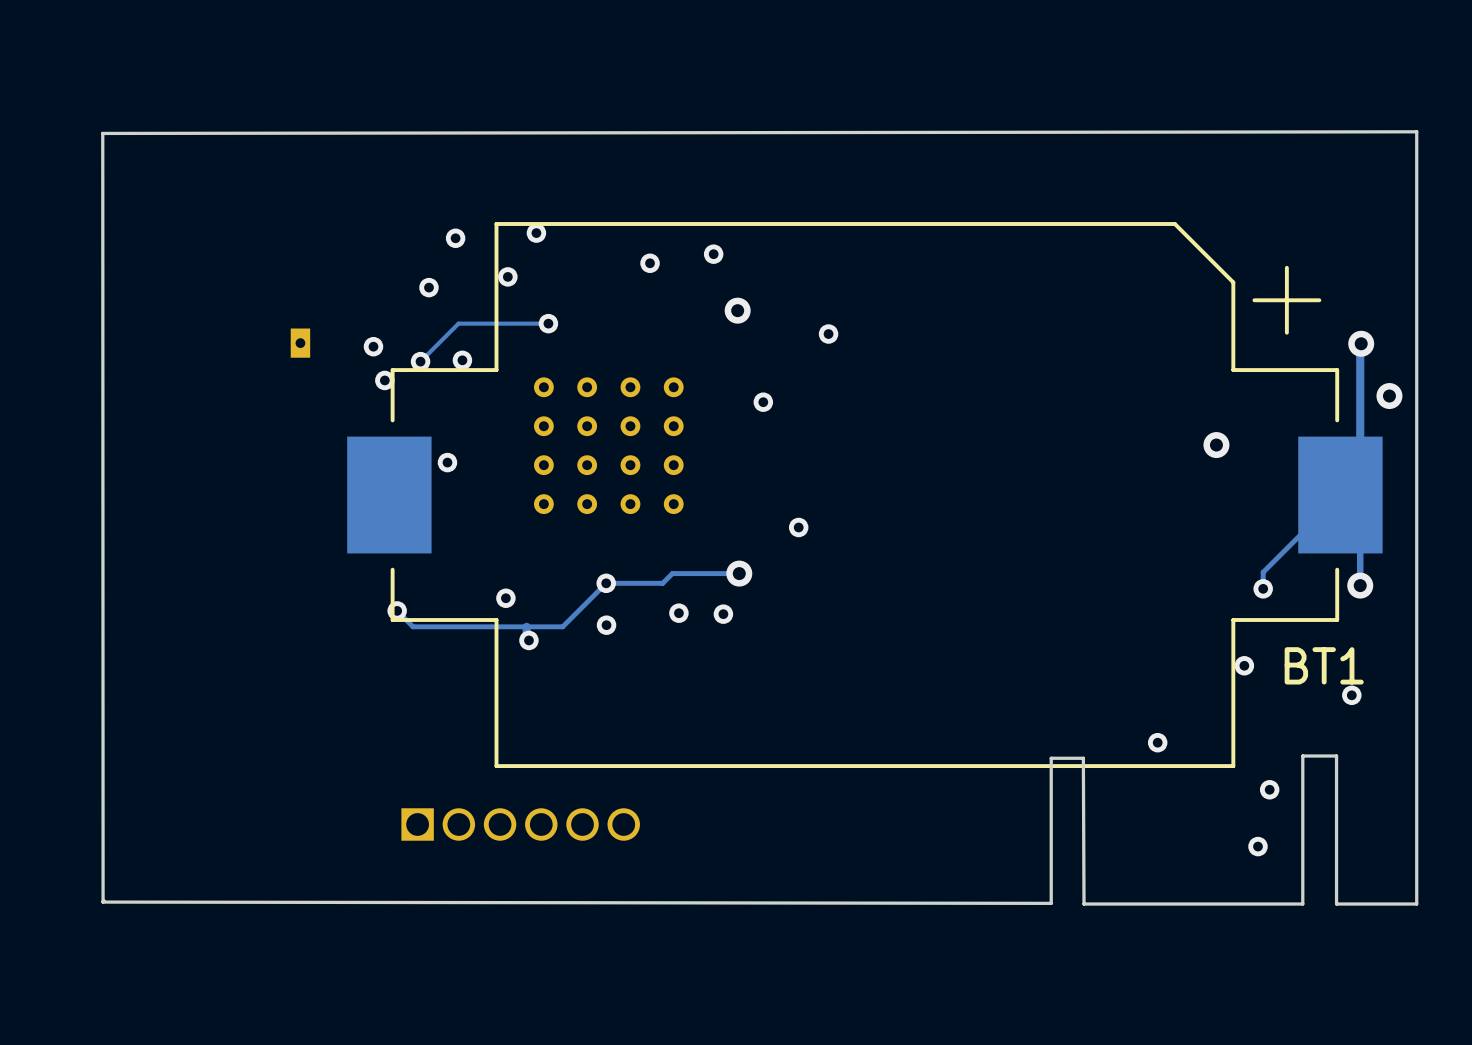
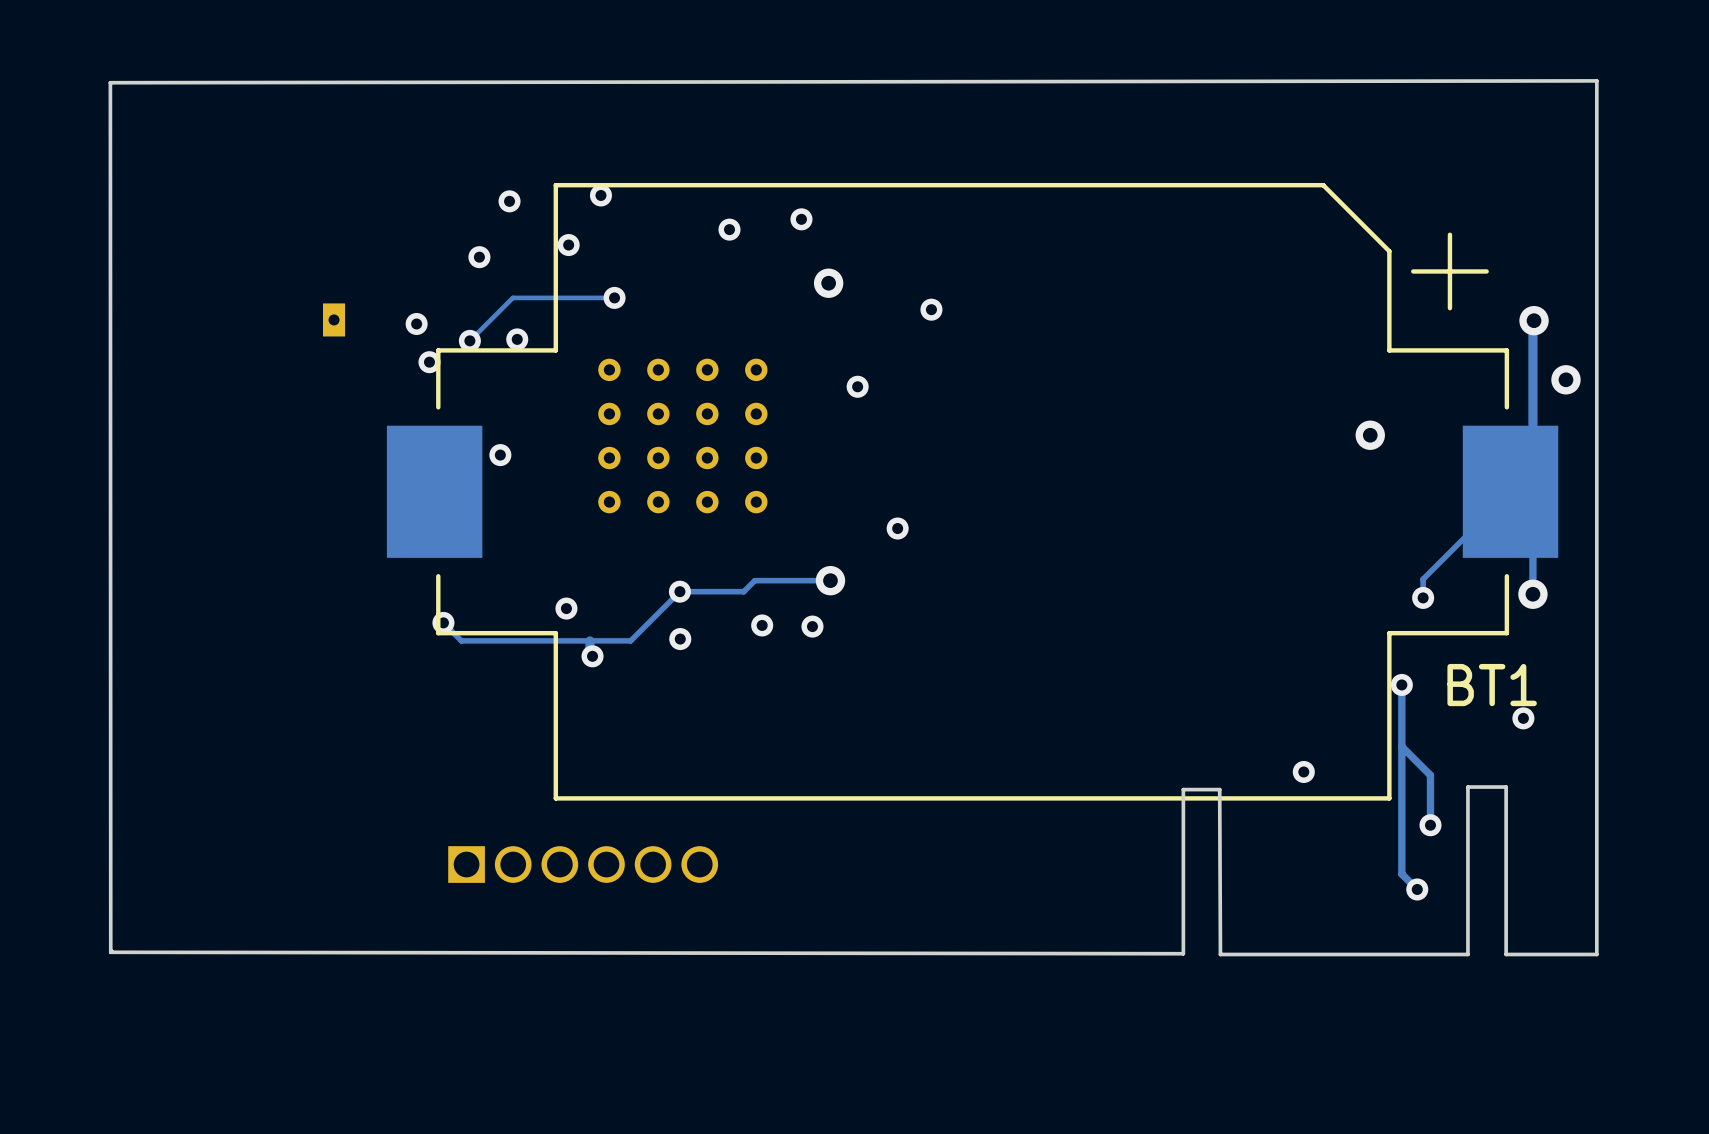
track: none -> (1401, 684) (1401, 874) (1417, 889)
track: none -> (1401, 746) (1430, 775) (1430, 825)

